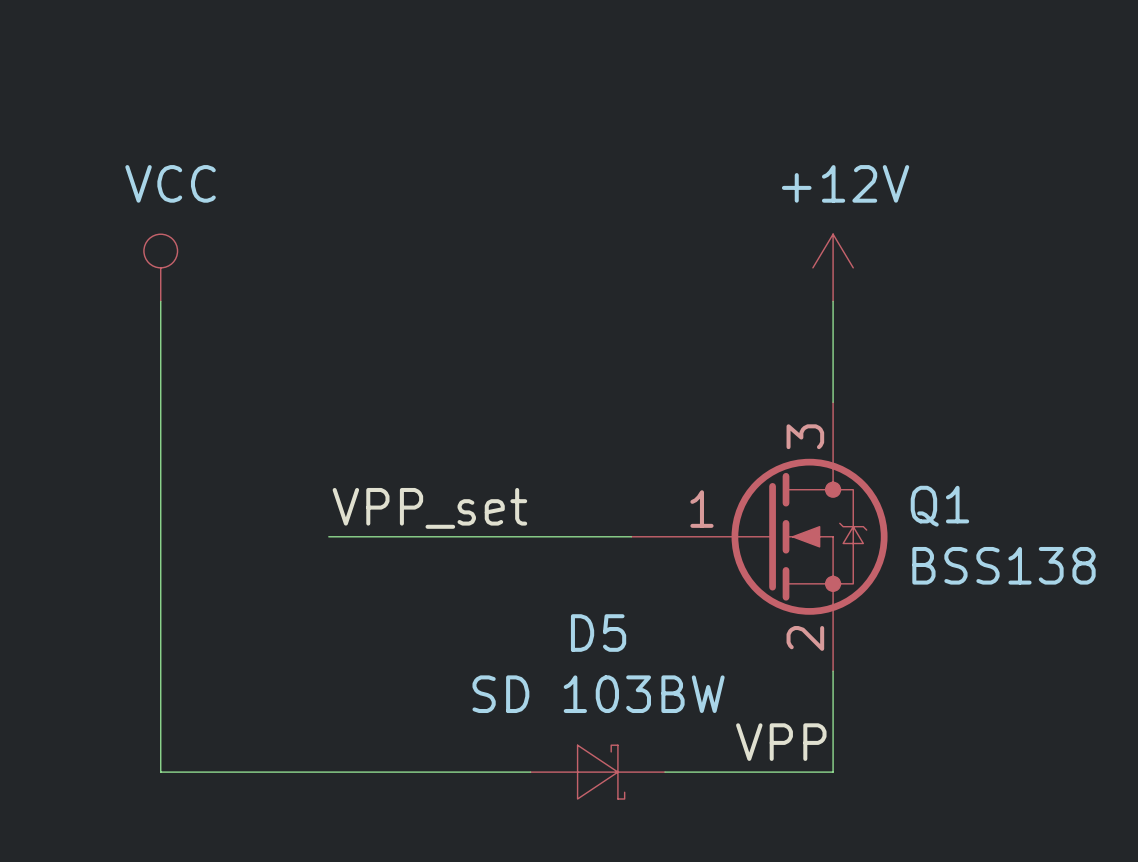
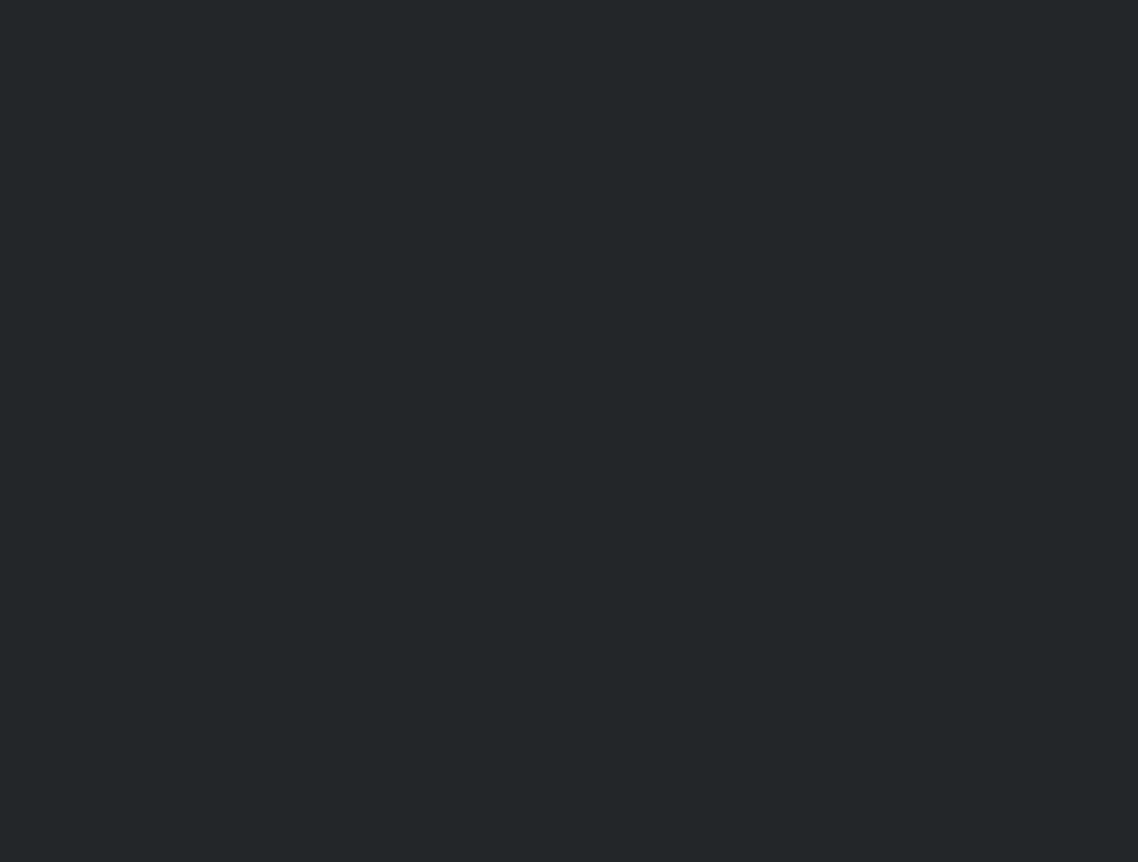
power symbol: VCC (160, 267) -> none
power symbol: +12V (833, 267) -> none
wire: (160, 301) (160, 772) (530, 772) -> none
wire: (833, 301) (833, 402) -> none
label: VPP_set (429, 508) -> none
wire: (328, 536) (631, 536) -> none
Q1: BSS138 (759, 536) -> none
wire: (833, 671) (833, 772) (664, 772) -> none
label: VPP (781, 742) -> none
D5: SD 103BW (597, 772) -> none

